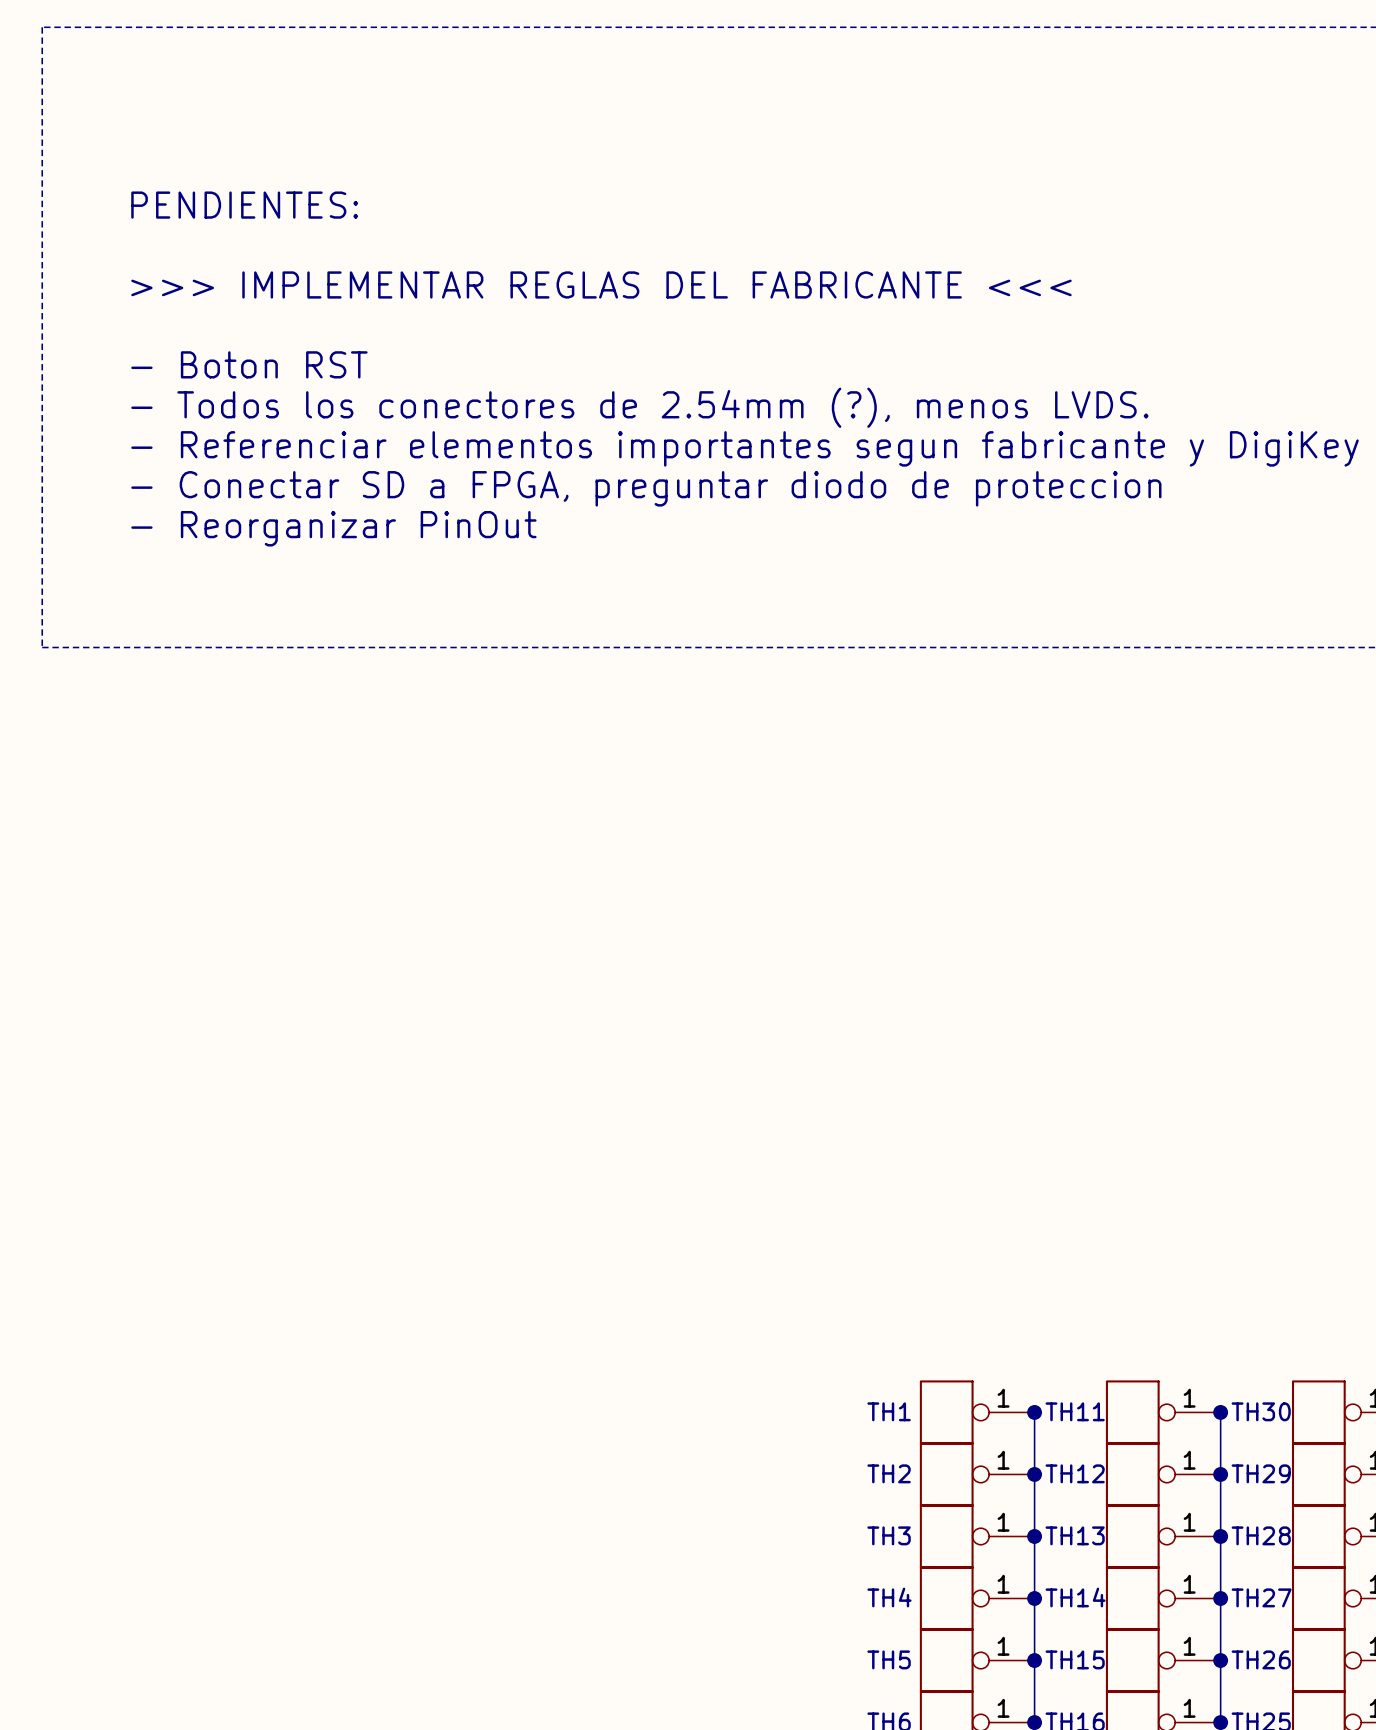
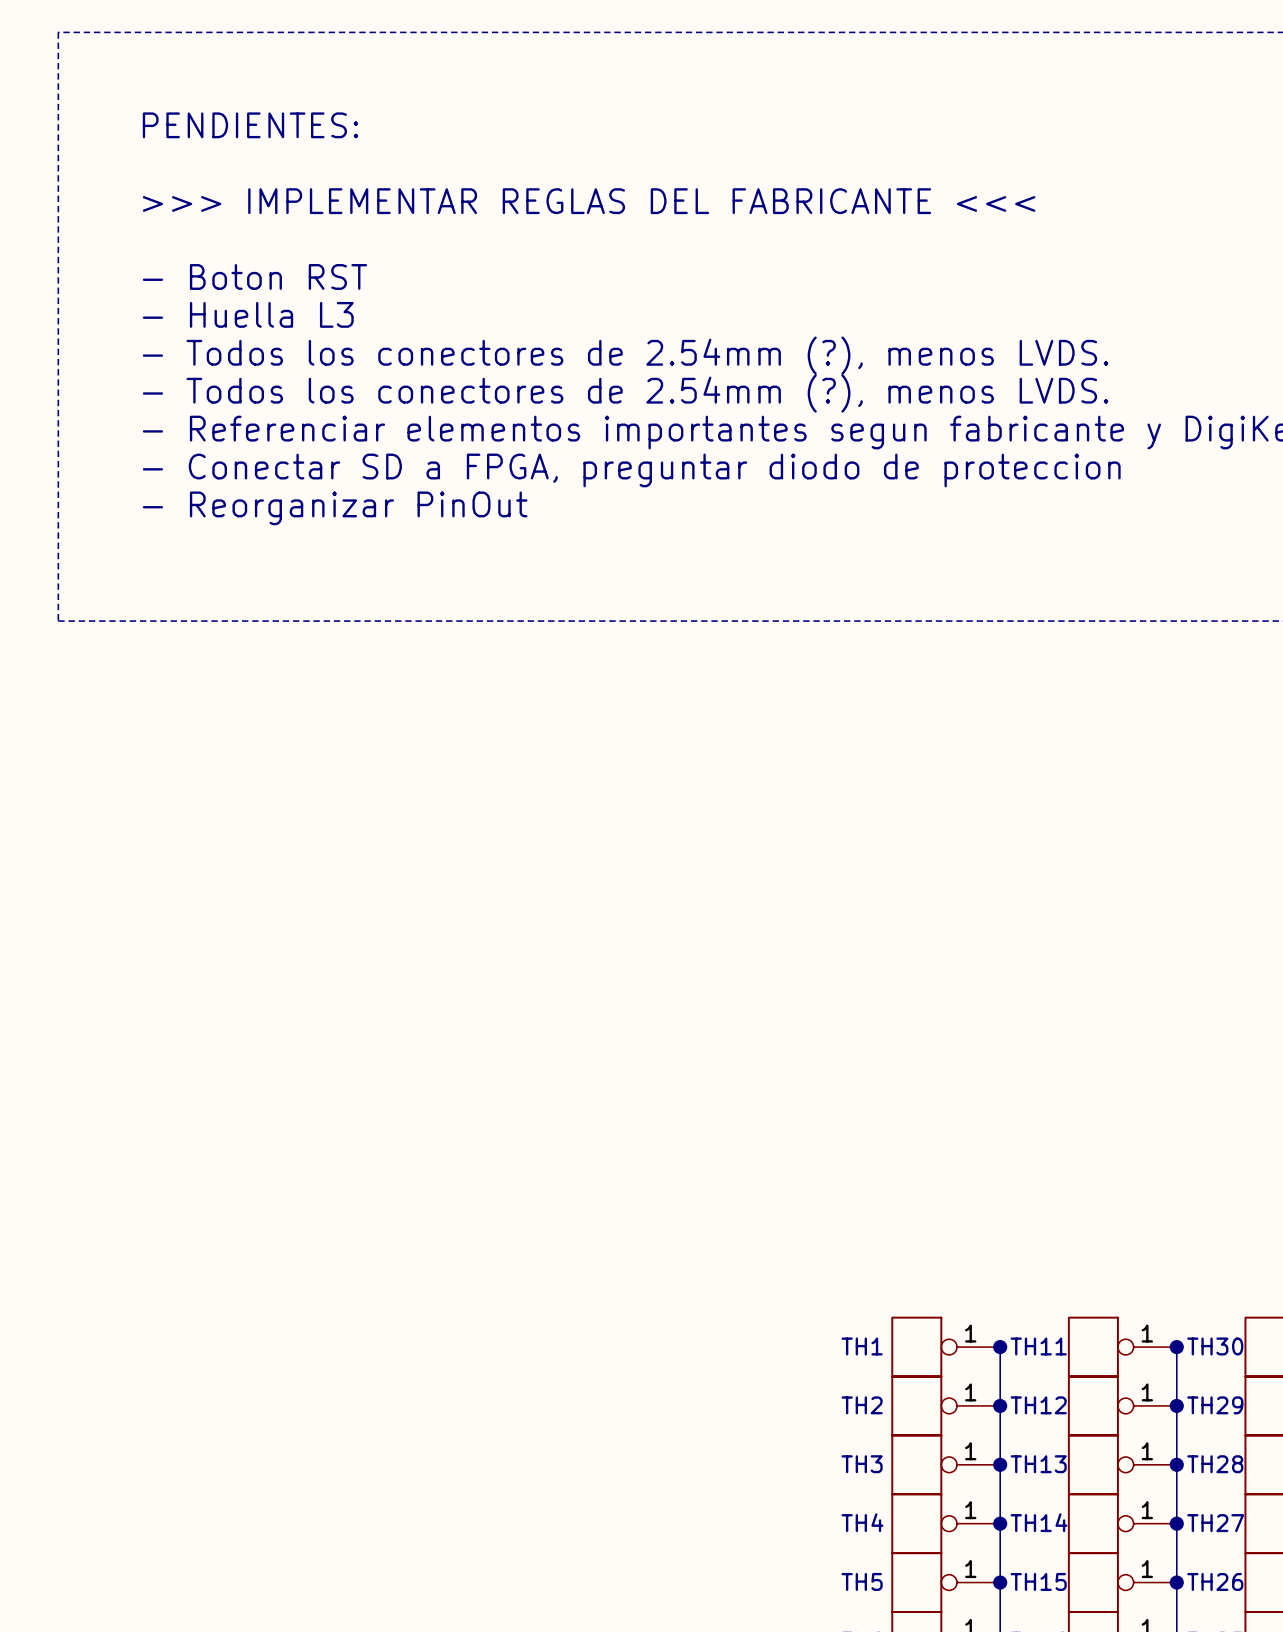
text: none -> PENDIENTES: (250, 125)
text: PENDIENTES: (244, 205) -> >>> IMPLEMENTAR REGLAS DEL FABRICANTE <<< (589, 201)
text: >>> IMPLEMENTAR REGLAS DEL FABRICANTE <<< (601, 284) -> - Boton RST (254, 276)
text: none -> - Huella L3 (248, 314)
text: - Boton RST (249, 364) -> - Todos los conectores de 2.54mm (?), menos LVDS. (625, 355)

